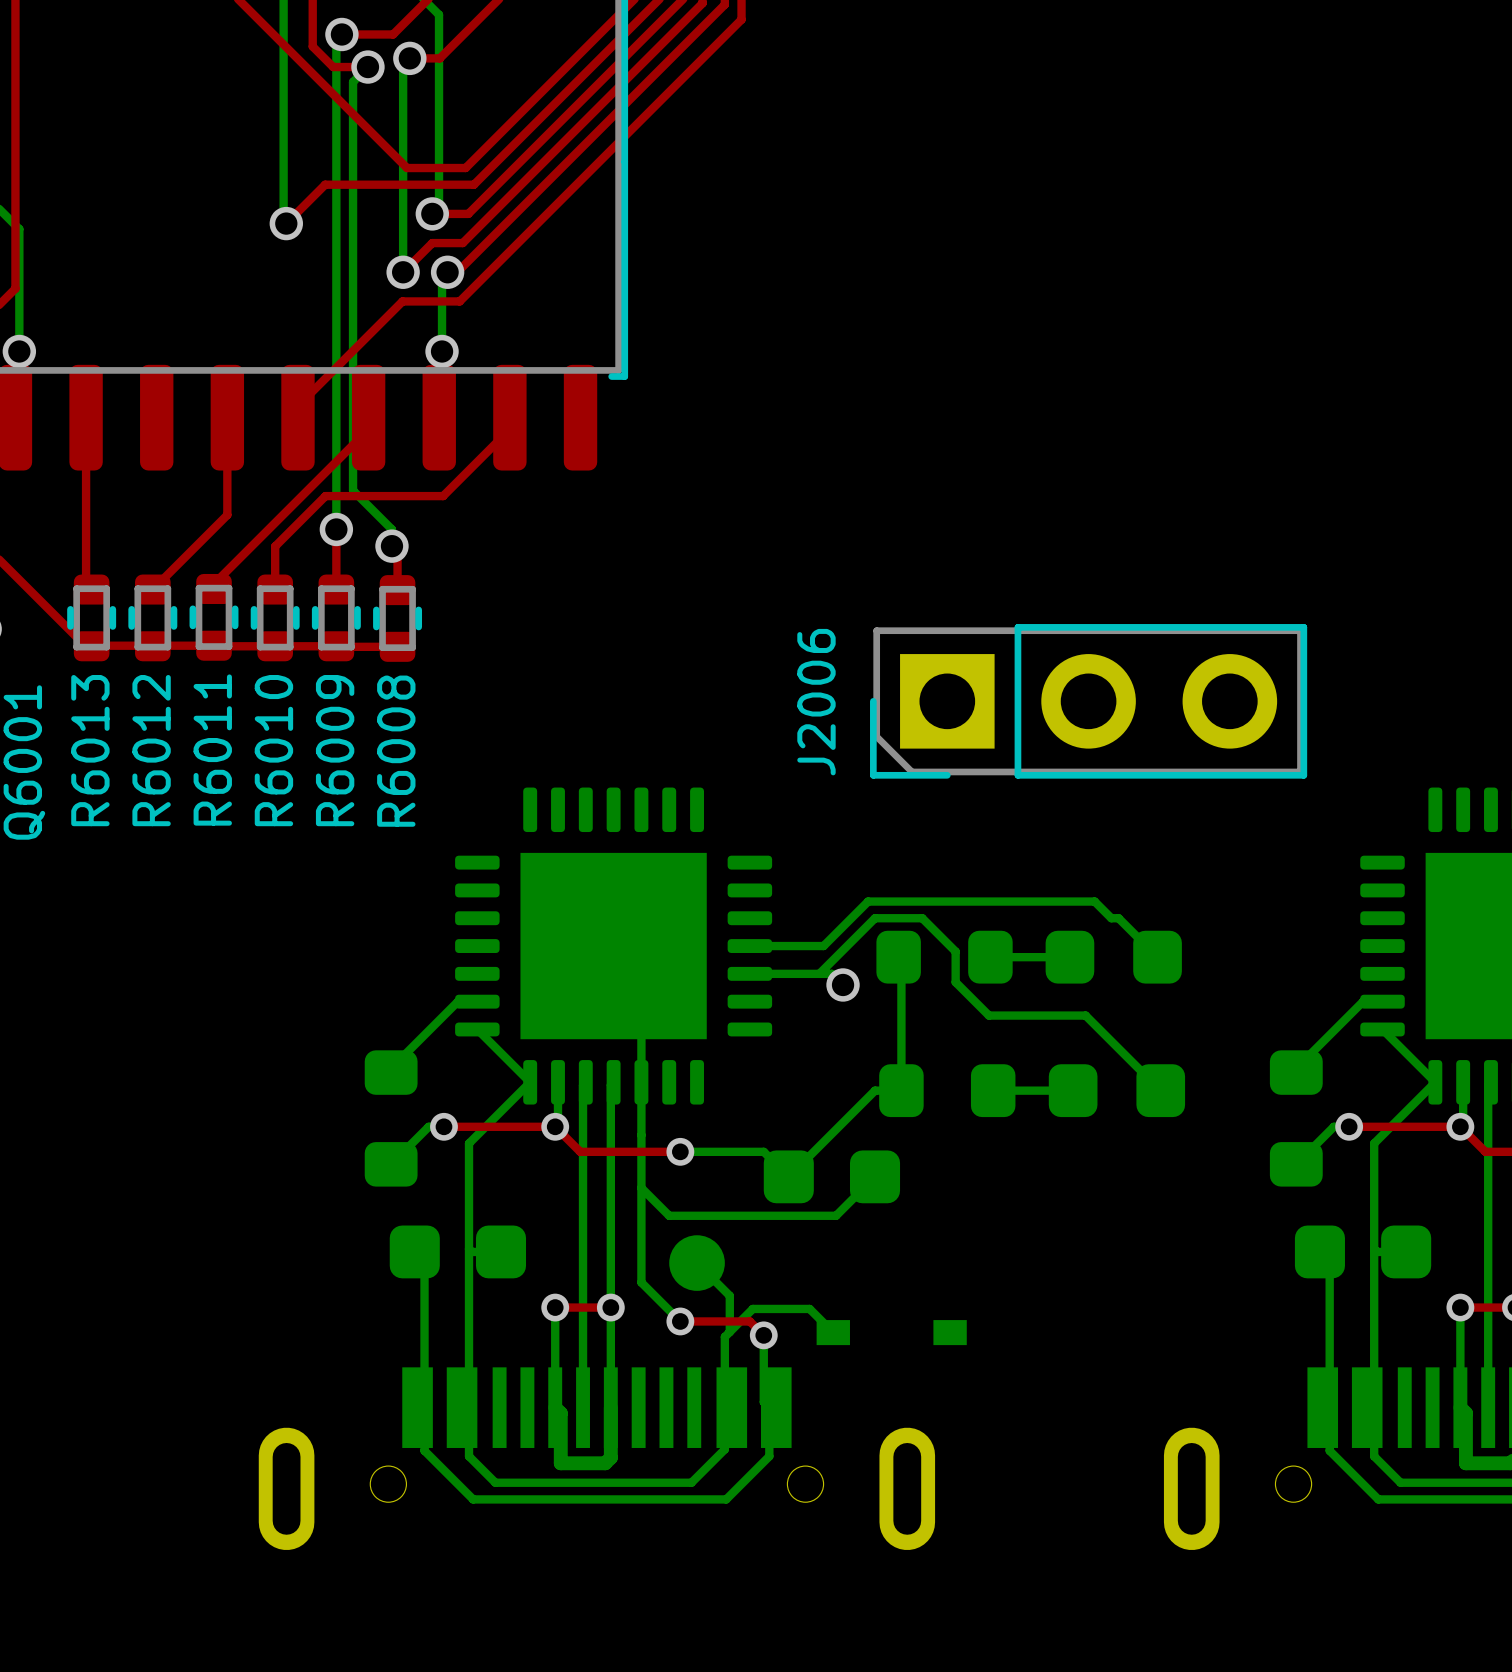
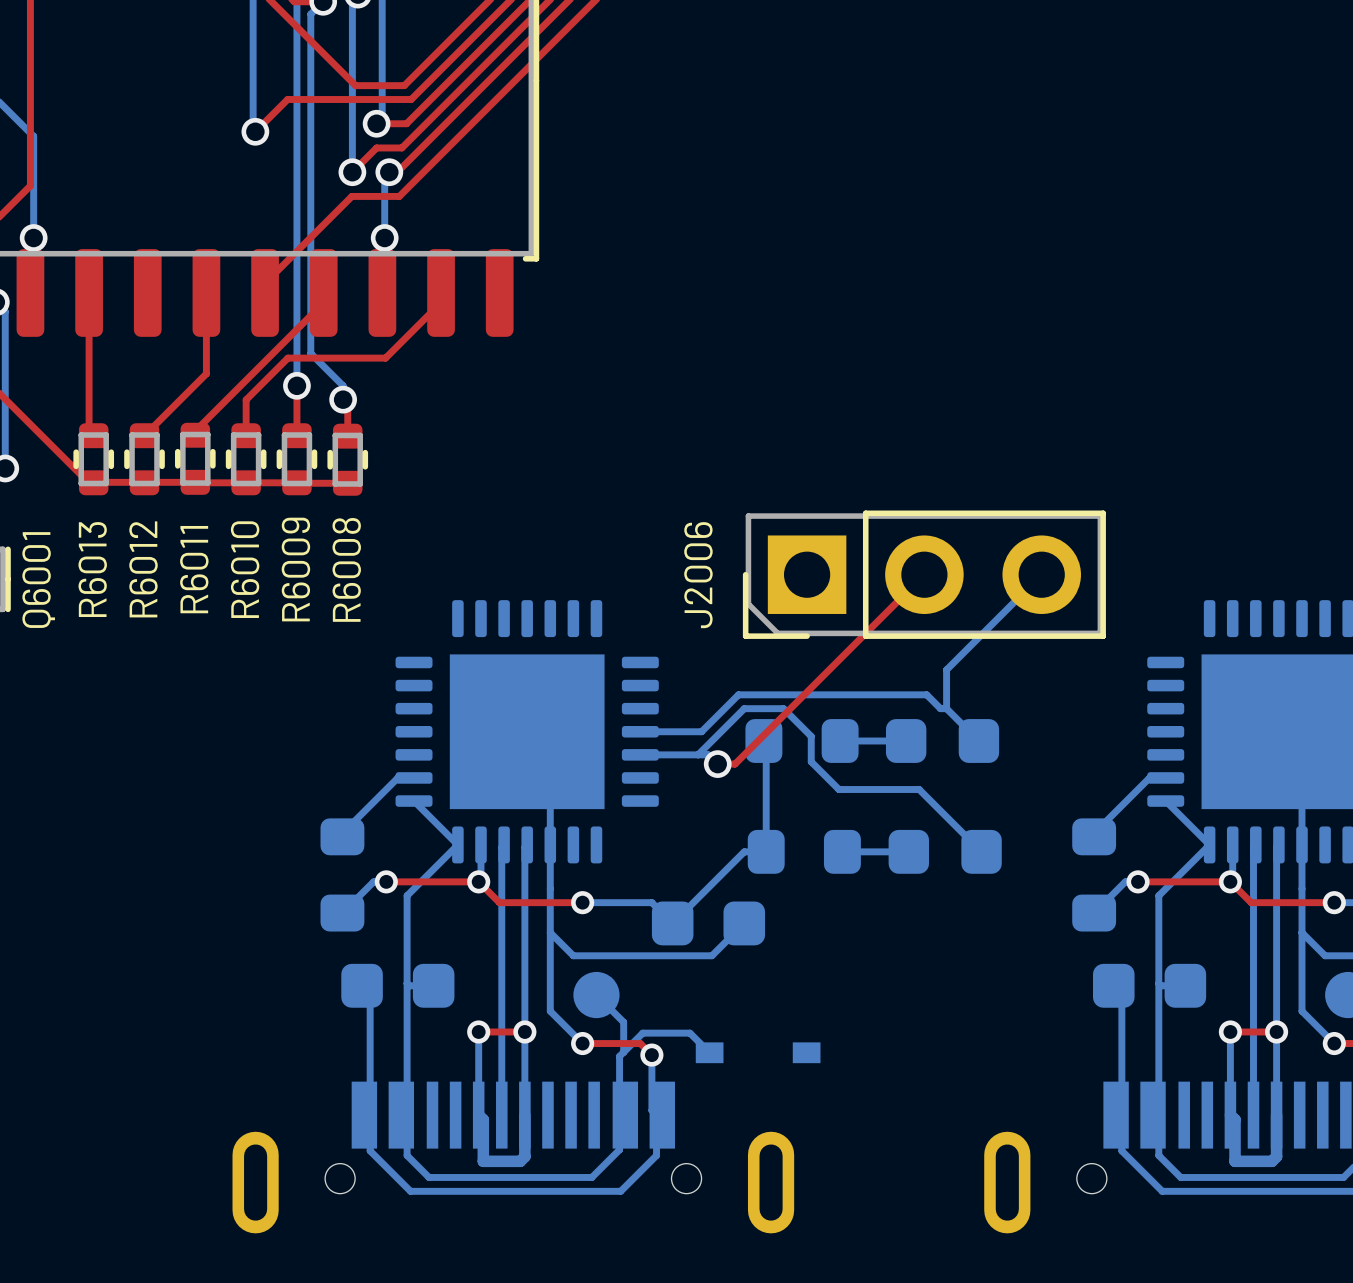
J2006 position: (1088, 701) -> (924, 574)
top track: none -> (924, 574) (735, 764) (717, 764)
bottom track: none -> (1041, 574) (946, 669) (946, 708)

